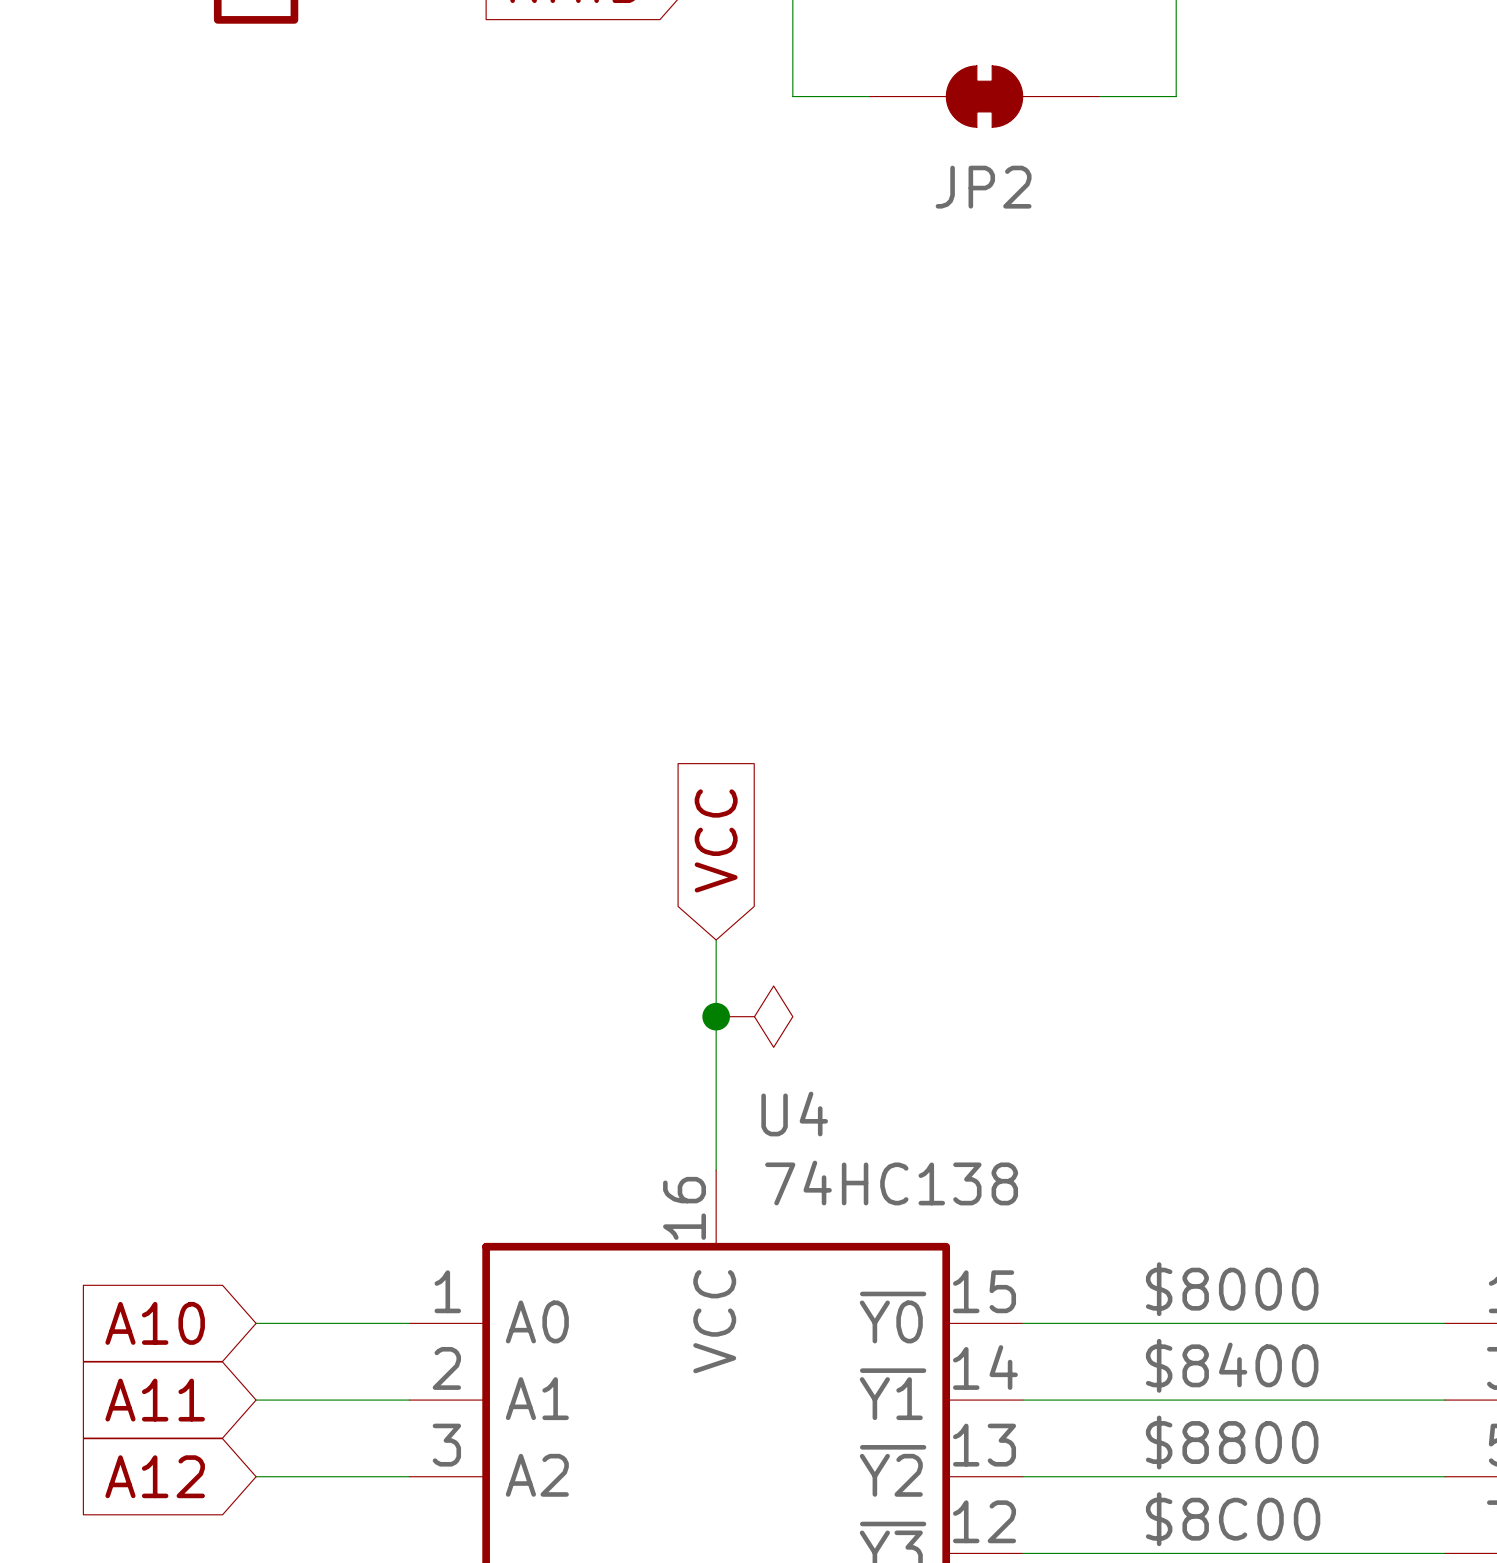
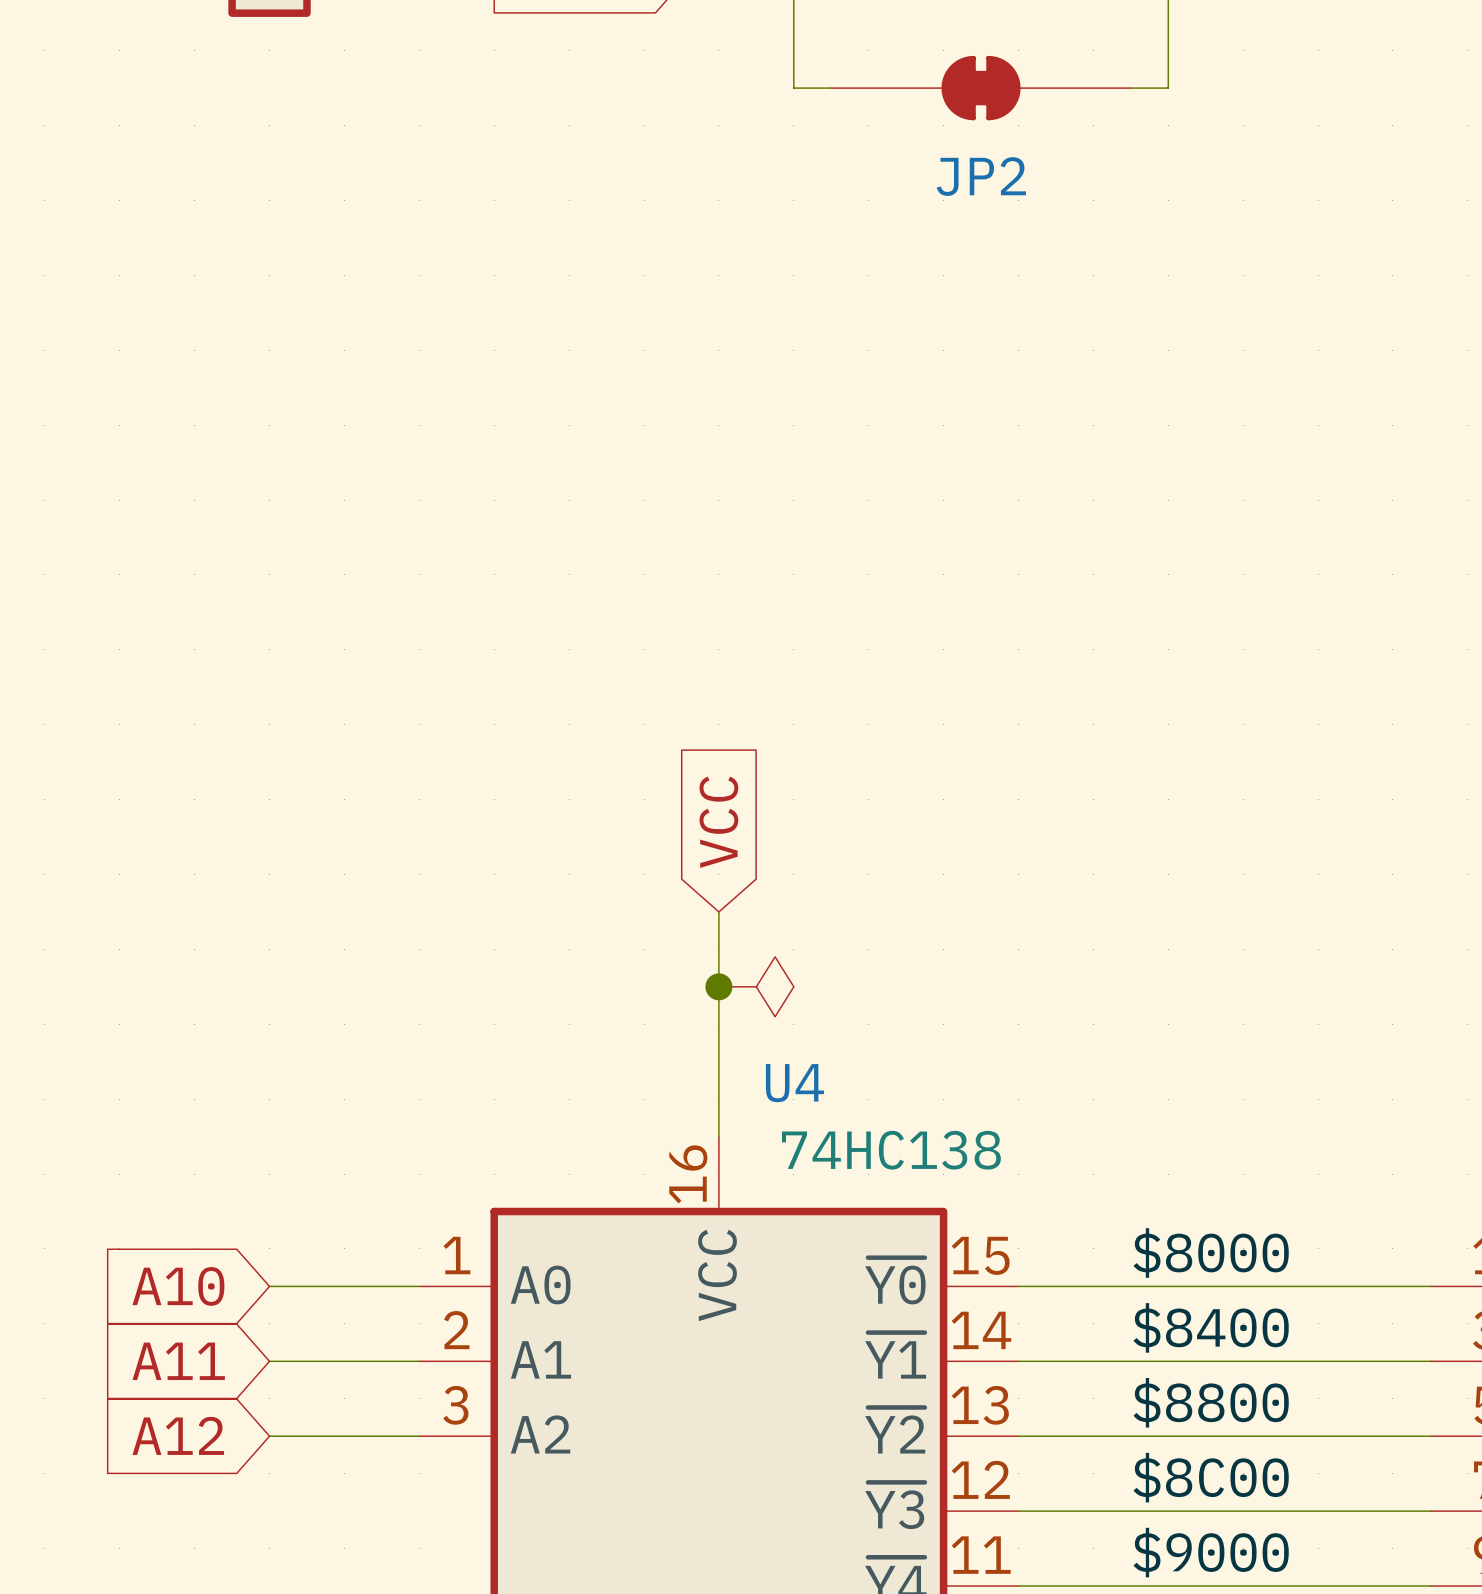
JP2 symbol: [869, 65, 1100, 128] -> [831, 55, 1131, 121]

